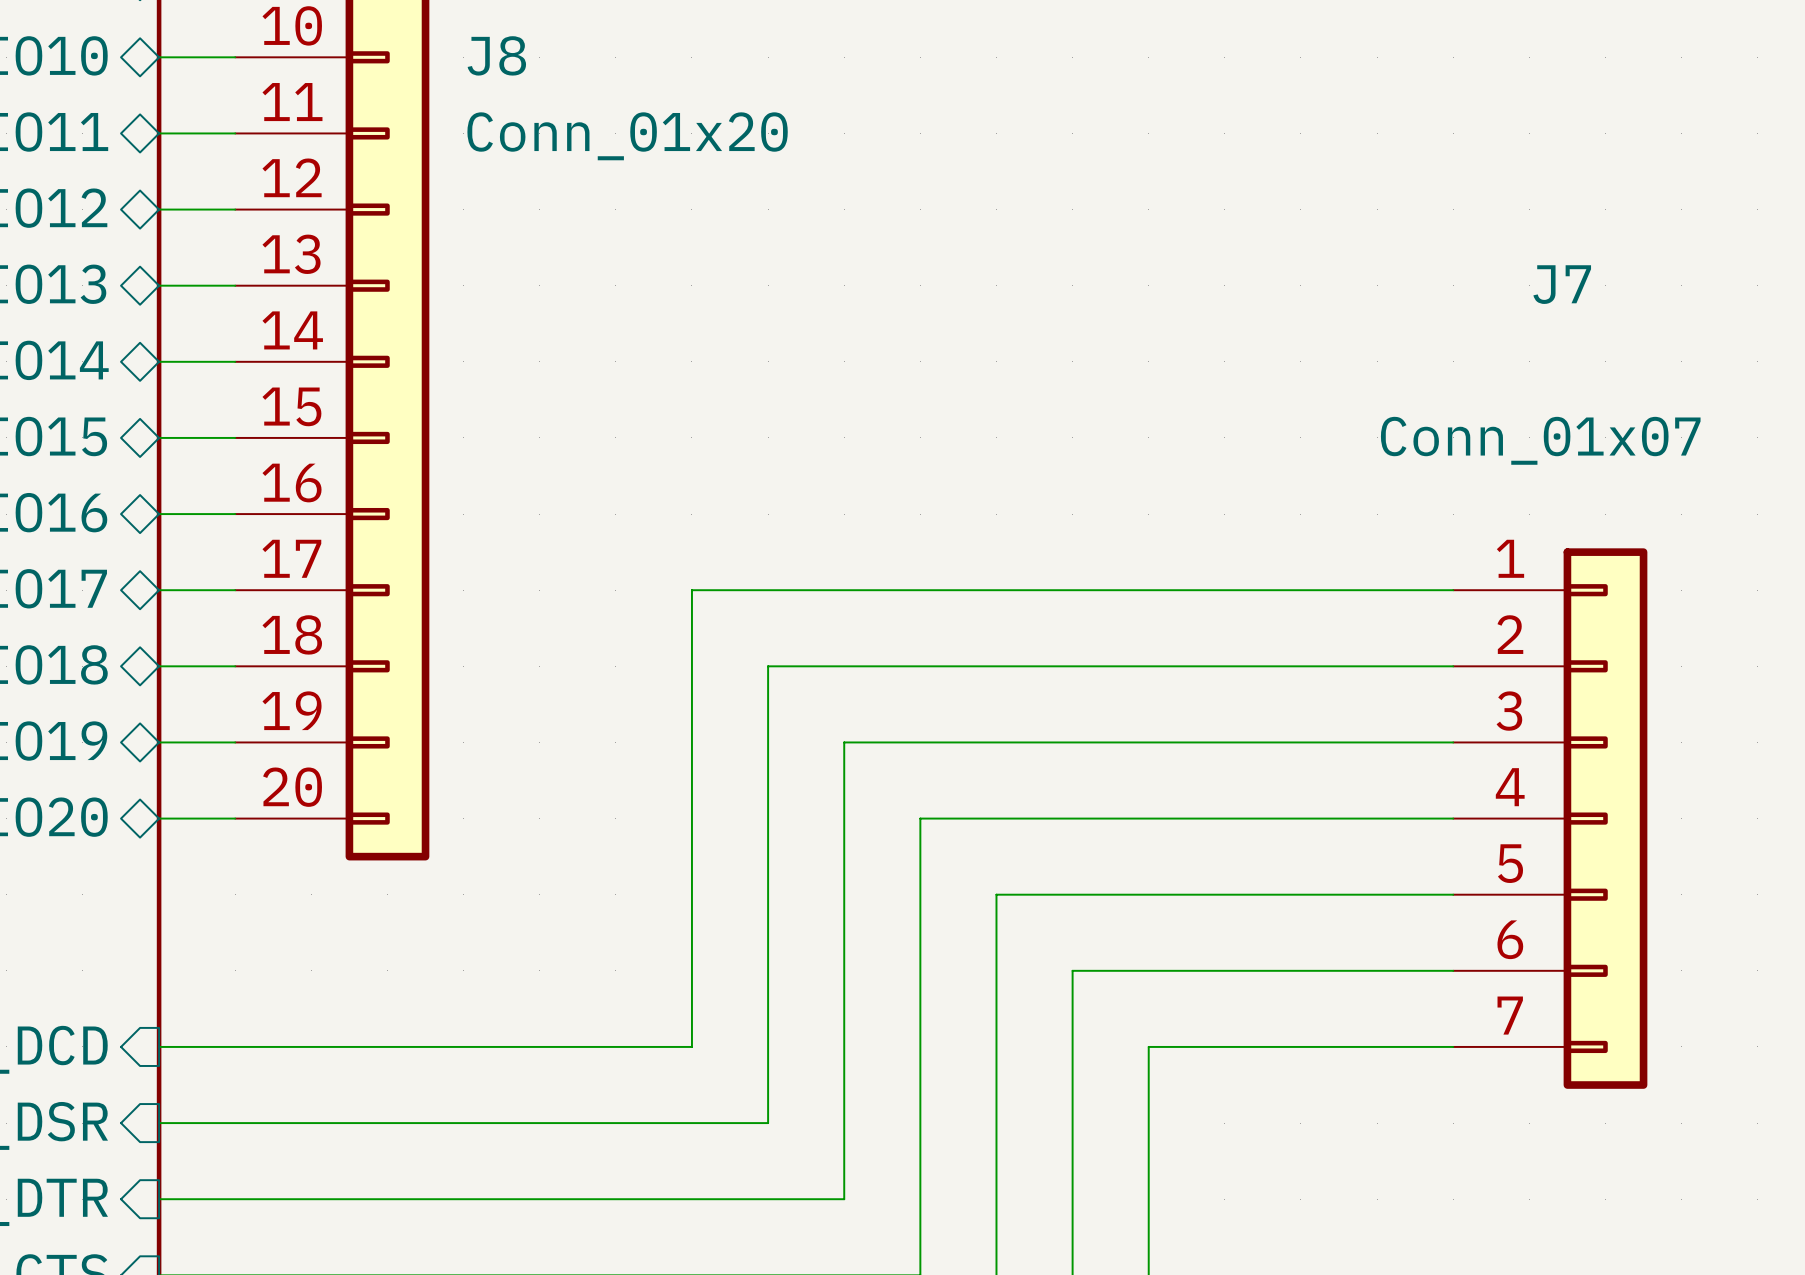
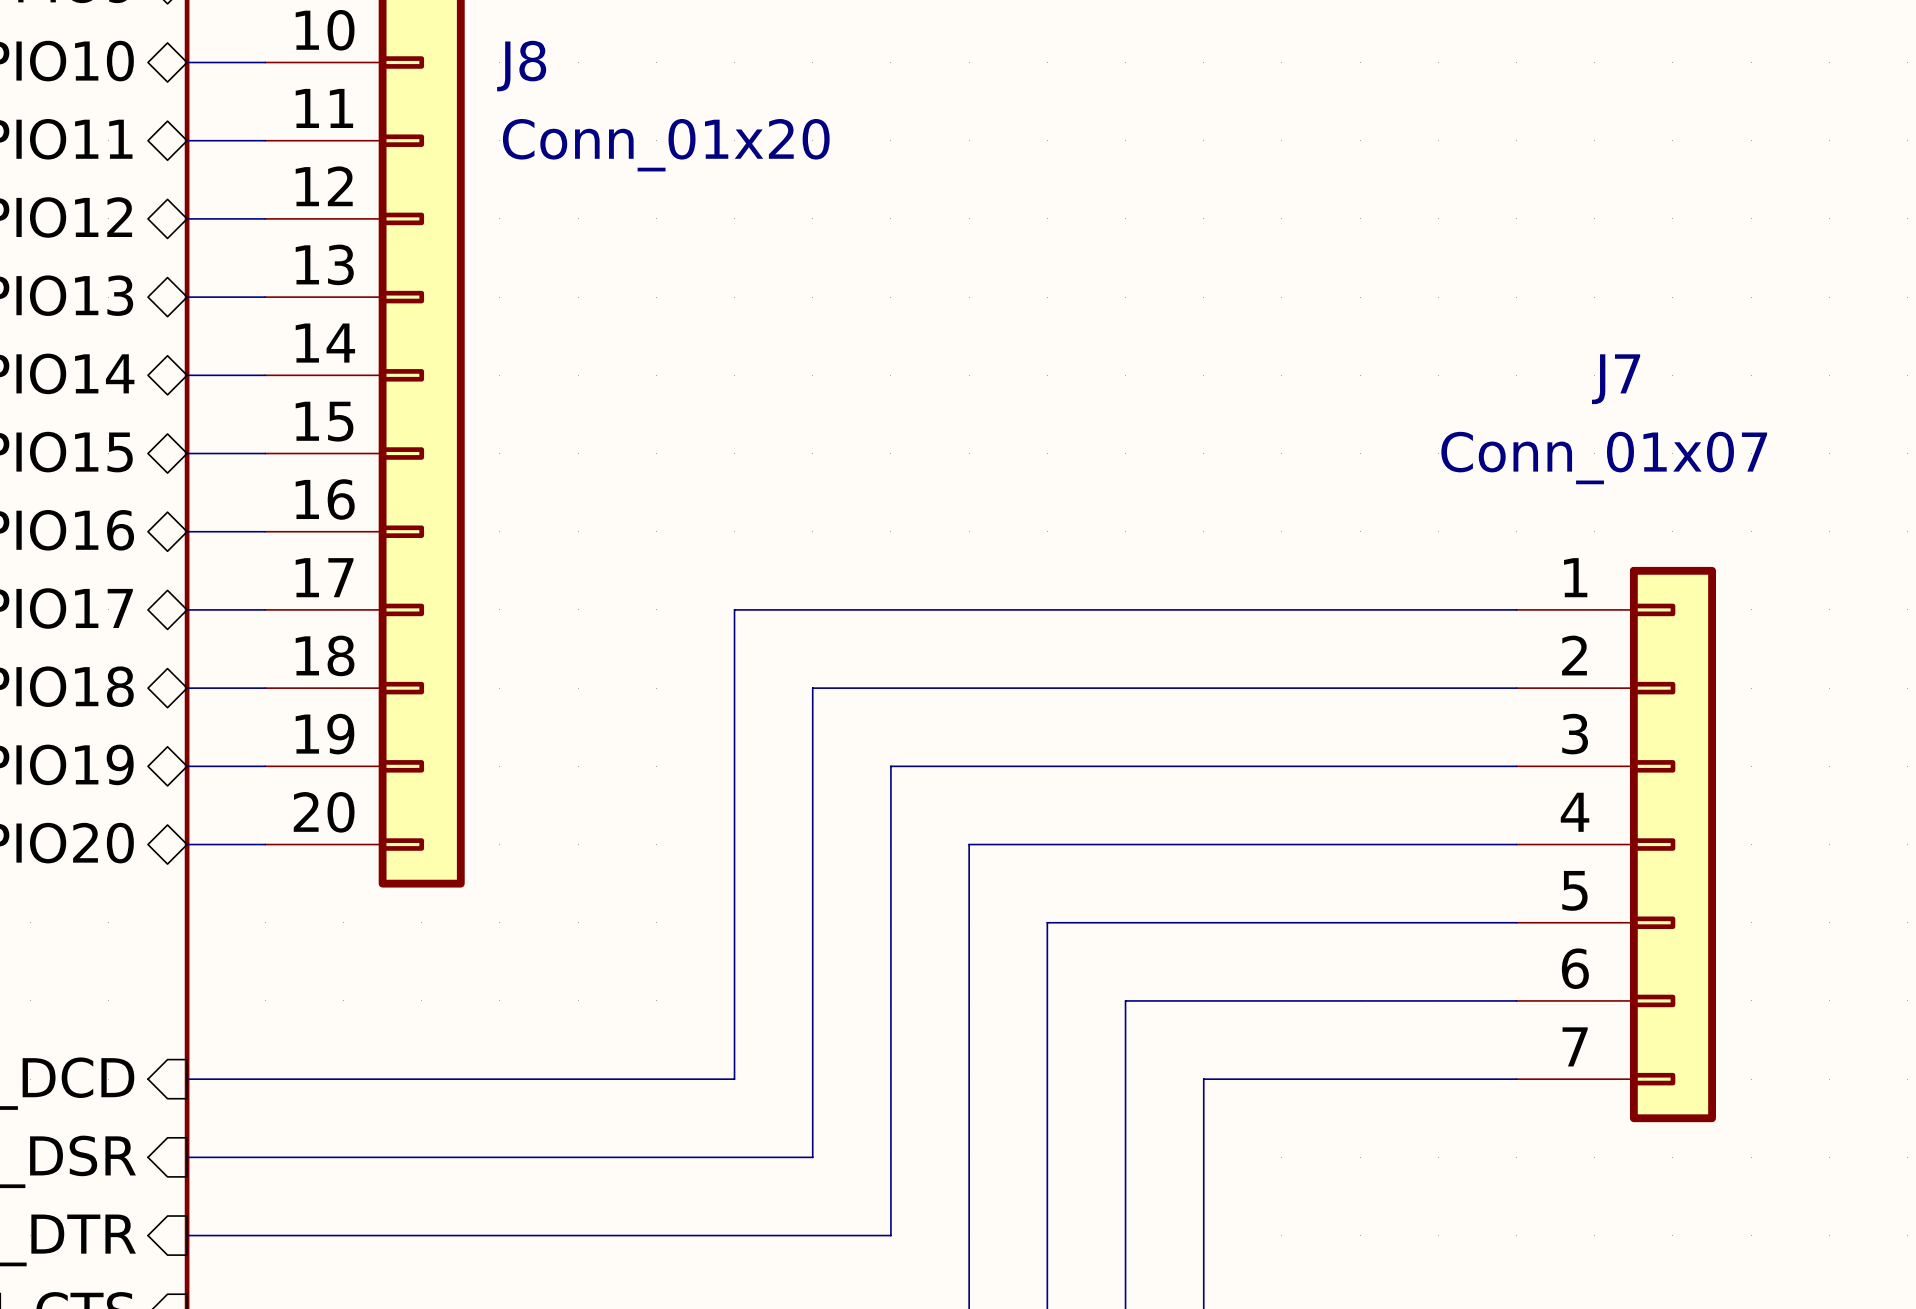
J7 name position: J7 (1562, 284) -> J7 (1616, 379)

